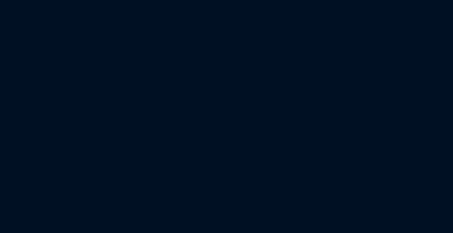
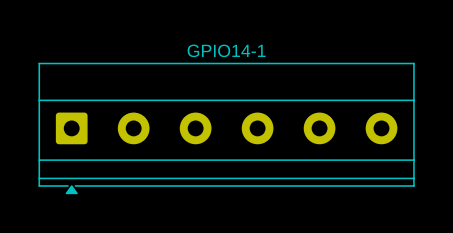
GPIO14-1: none -> (226, 128)

